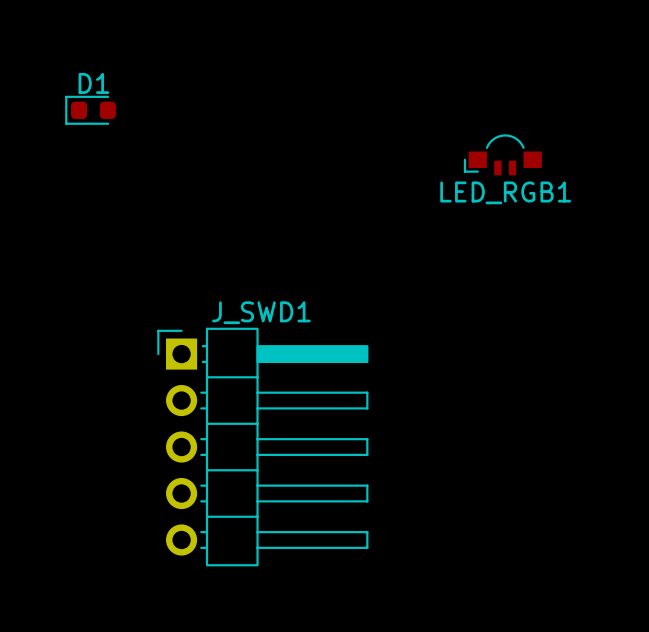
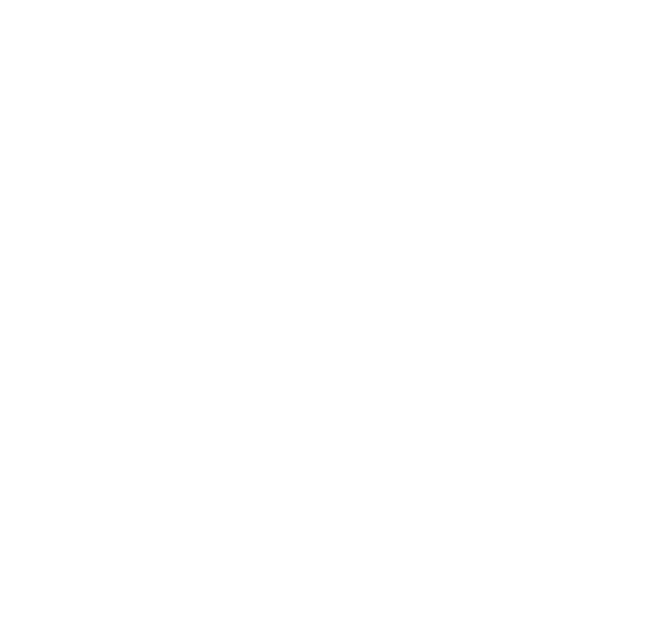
D1: (90, 110) -> none
LED_RGB1: (502, 154) -> none
J_SWD1: (262, 447) -> none

